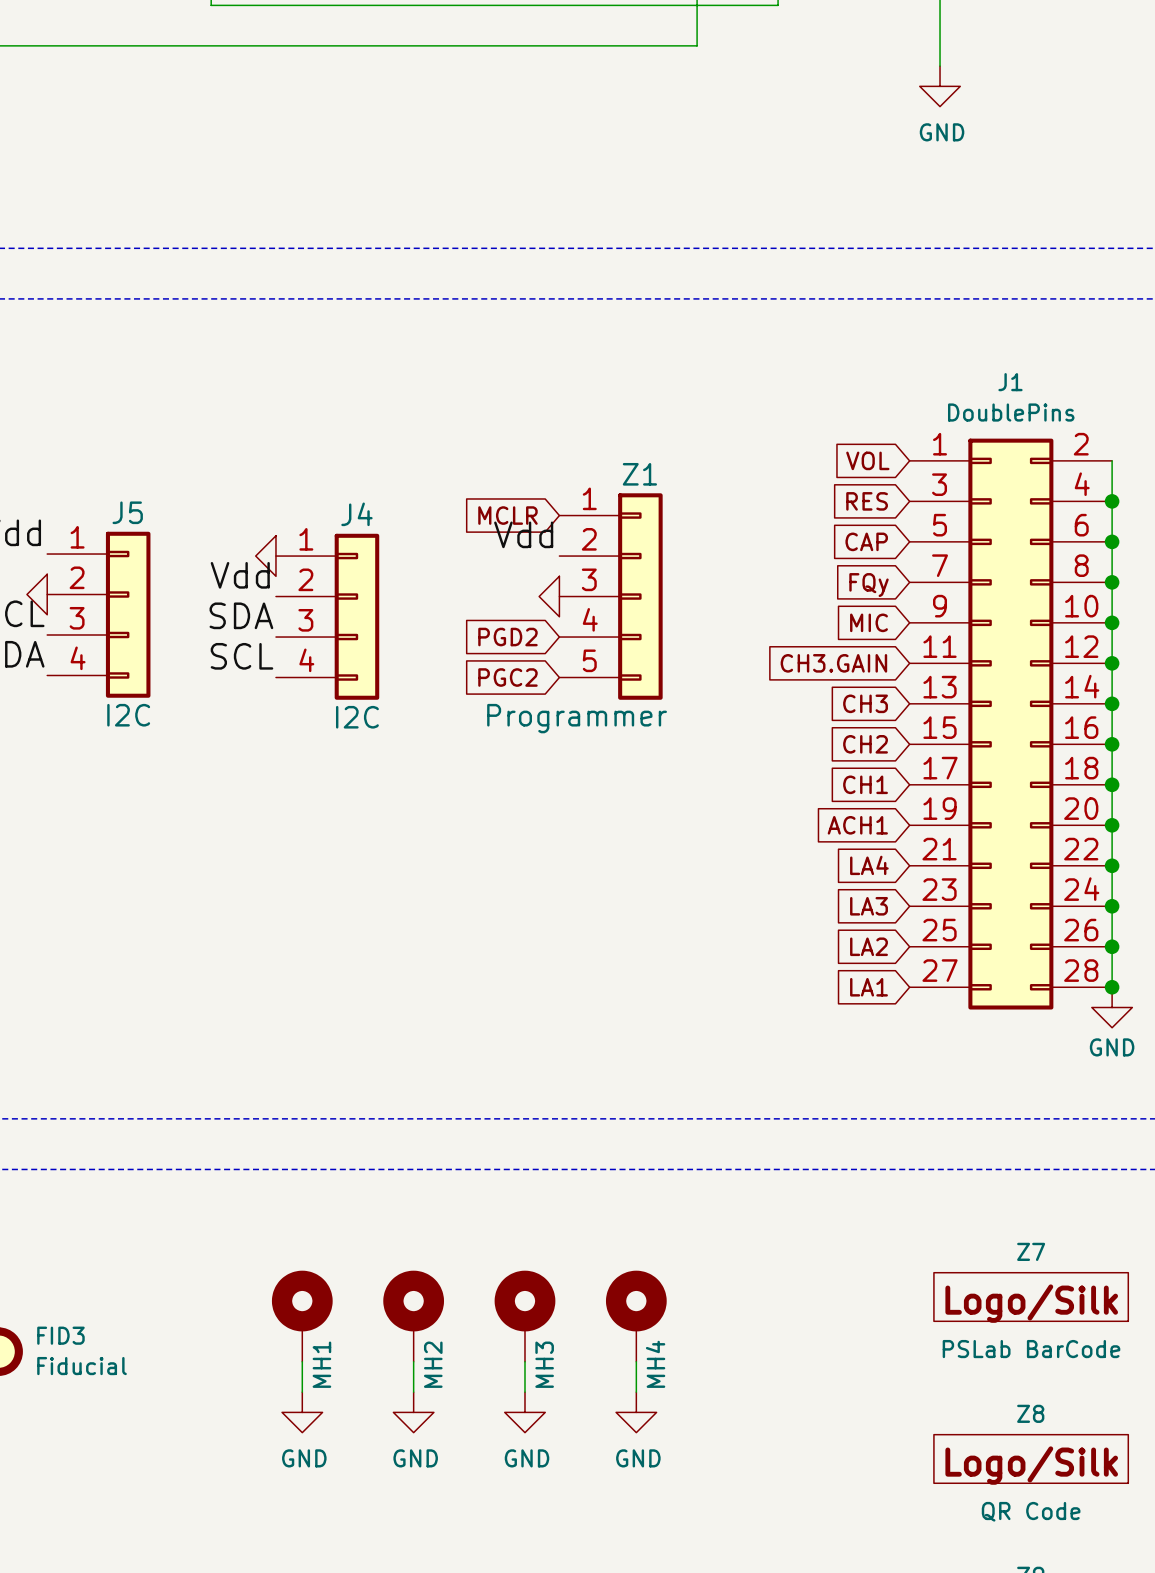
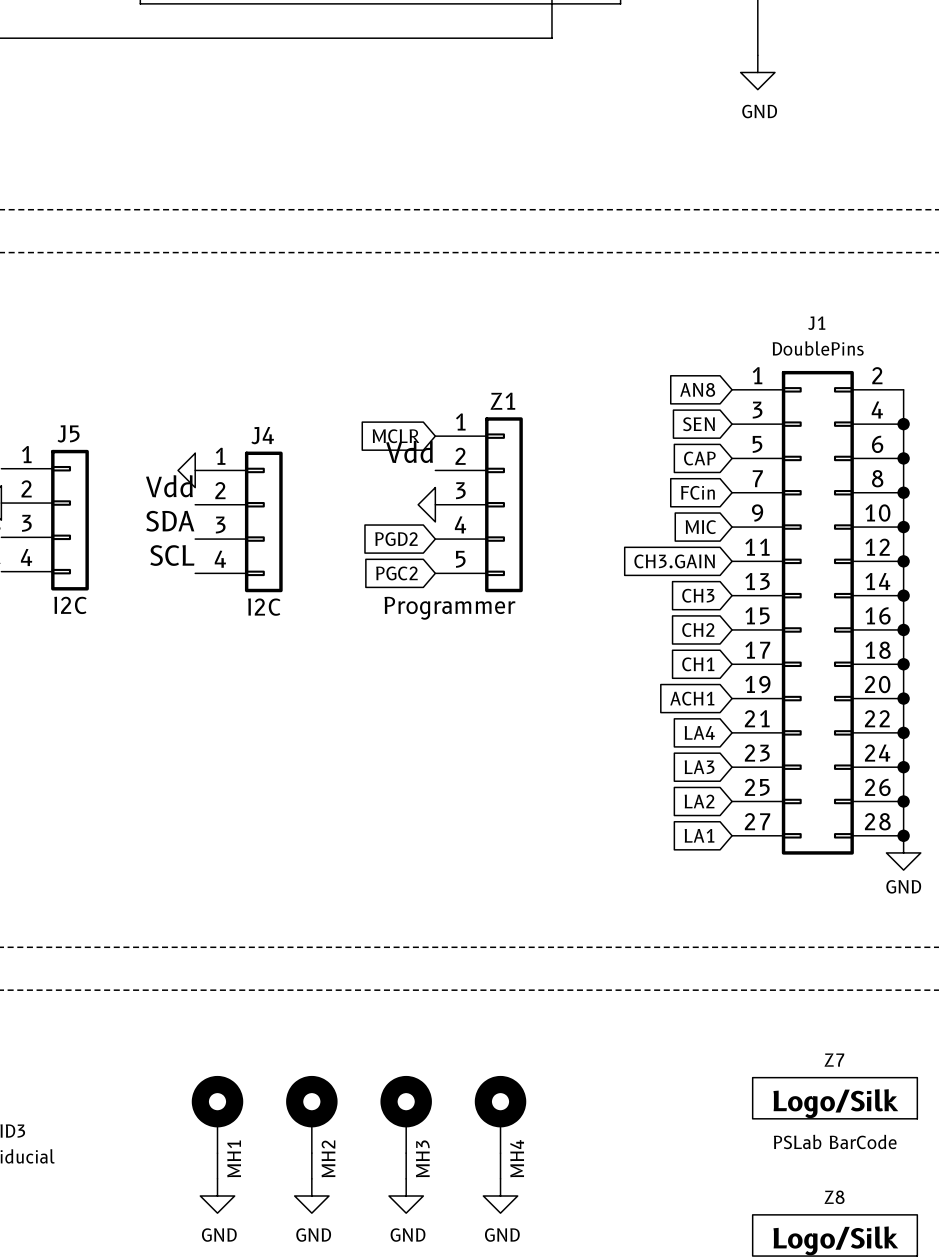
global label: VOL (867, 460) -> AN8 (697, 389)
global label: RES (867, 501) -> SEN (698, 424)
global label: FQy (869, 585) -> FCin (697, 492)

